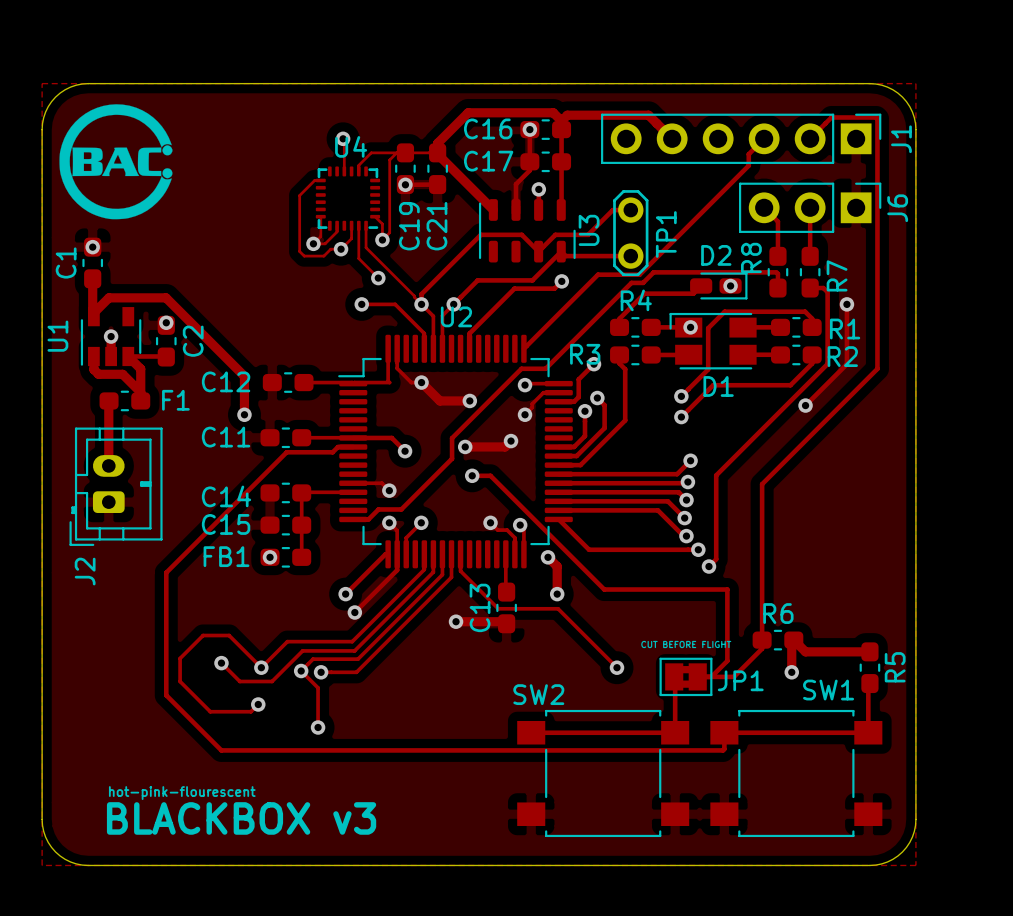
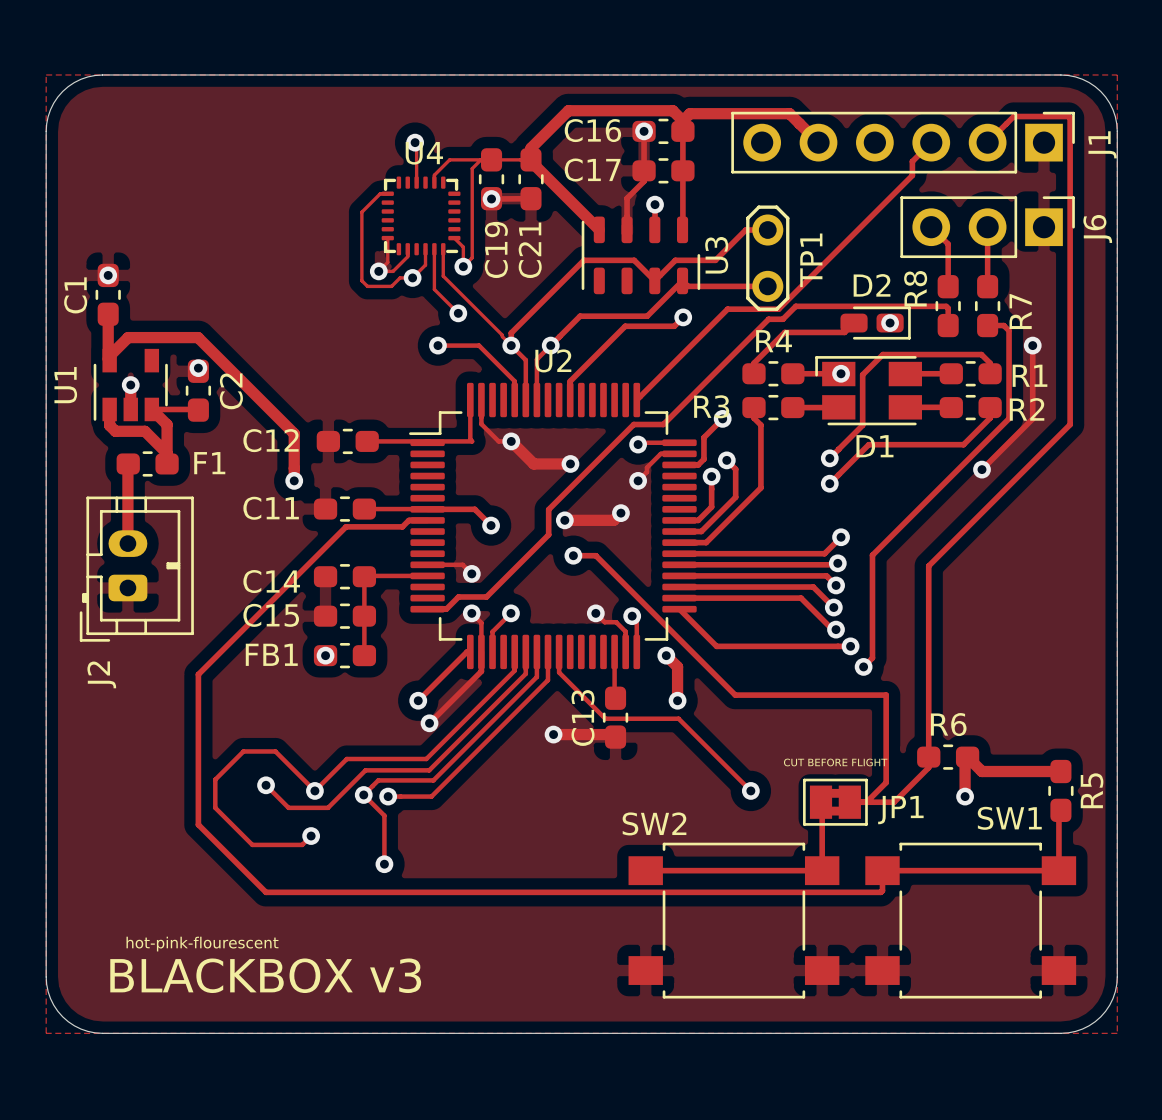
drawing: [59, 104, 173, 220] -> none

